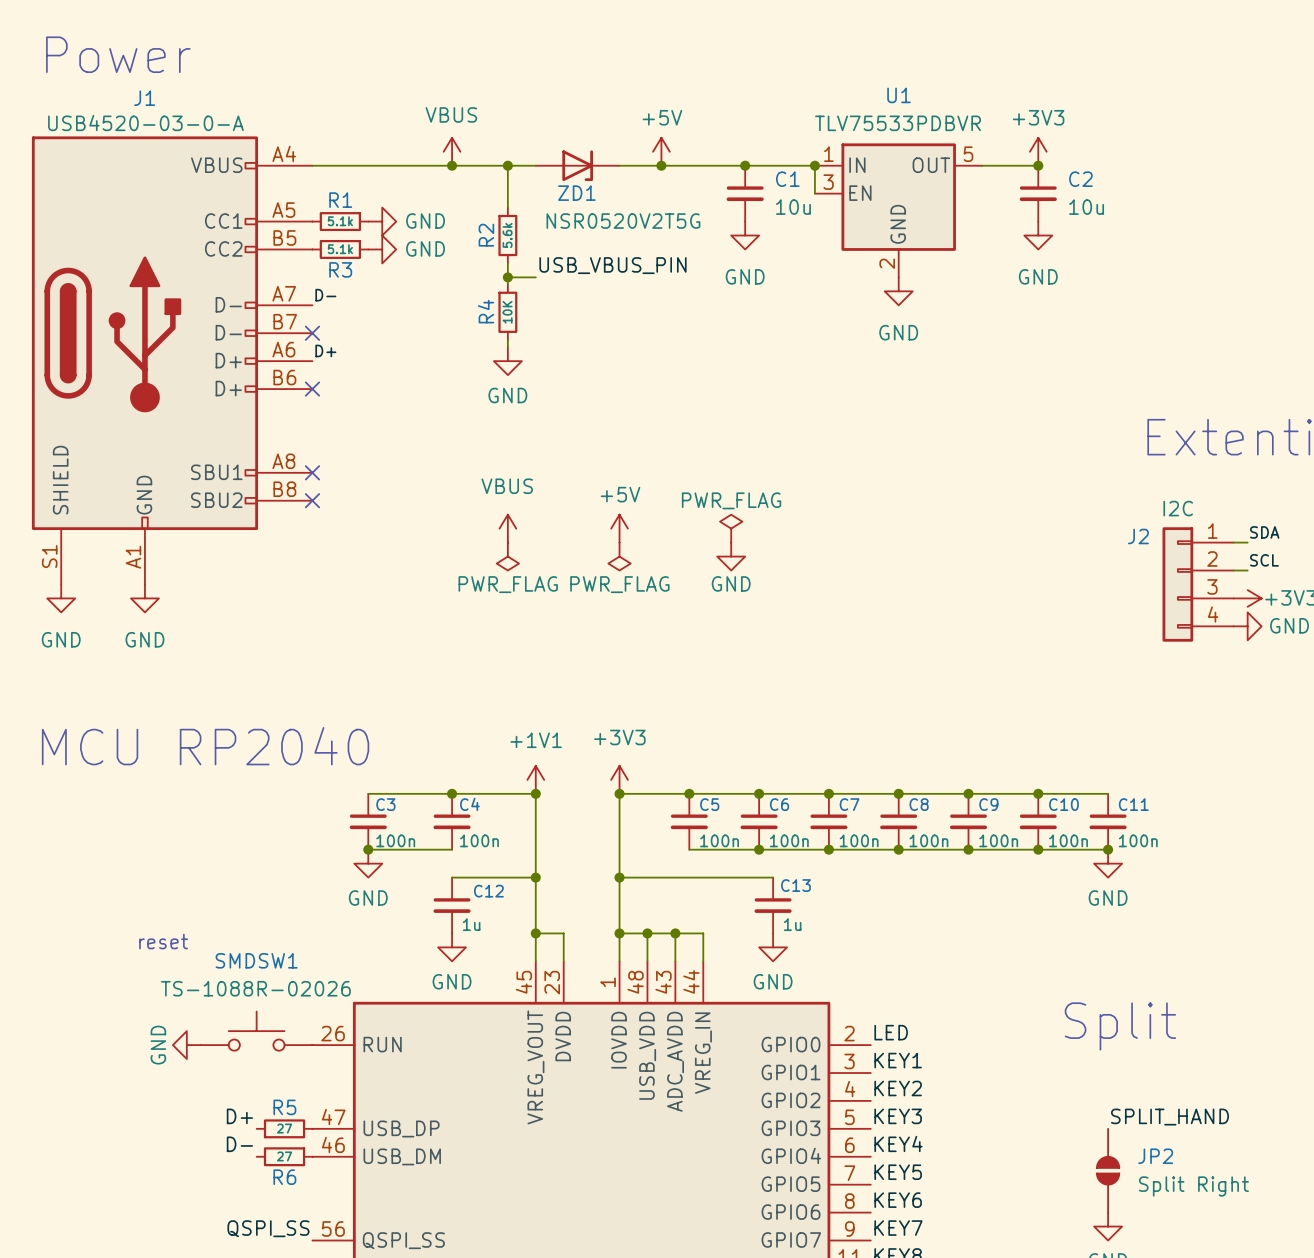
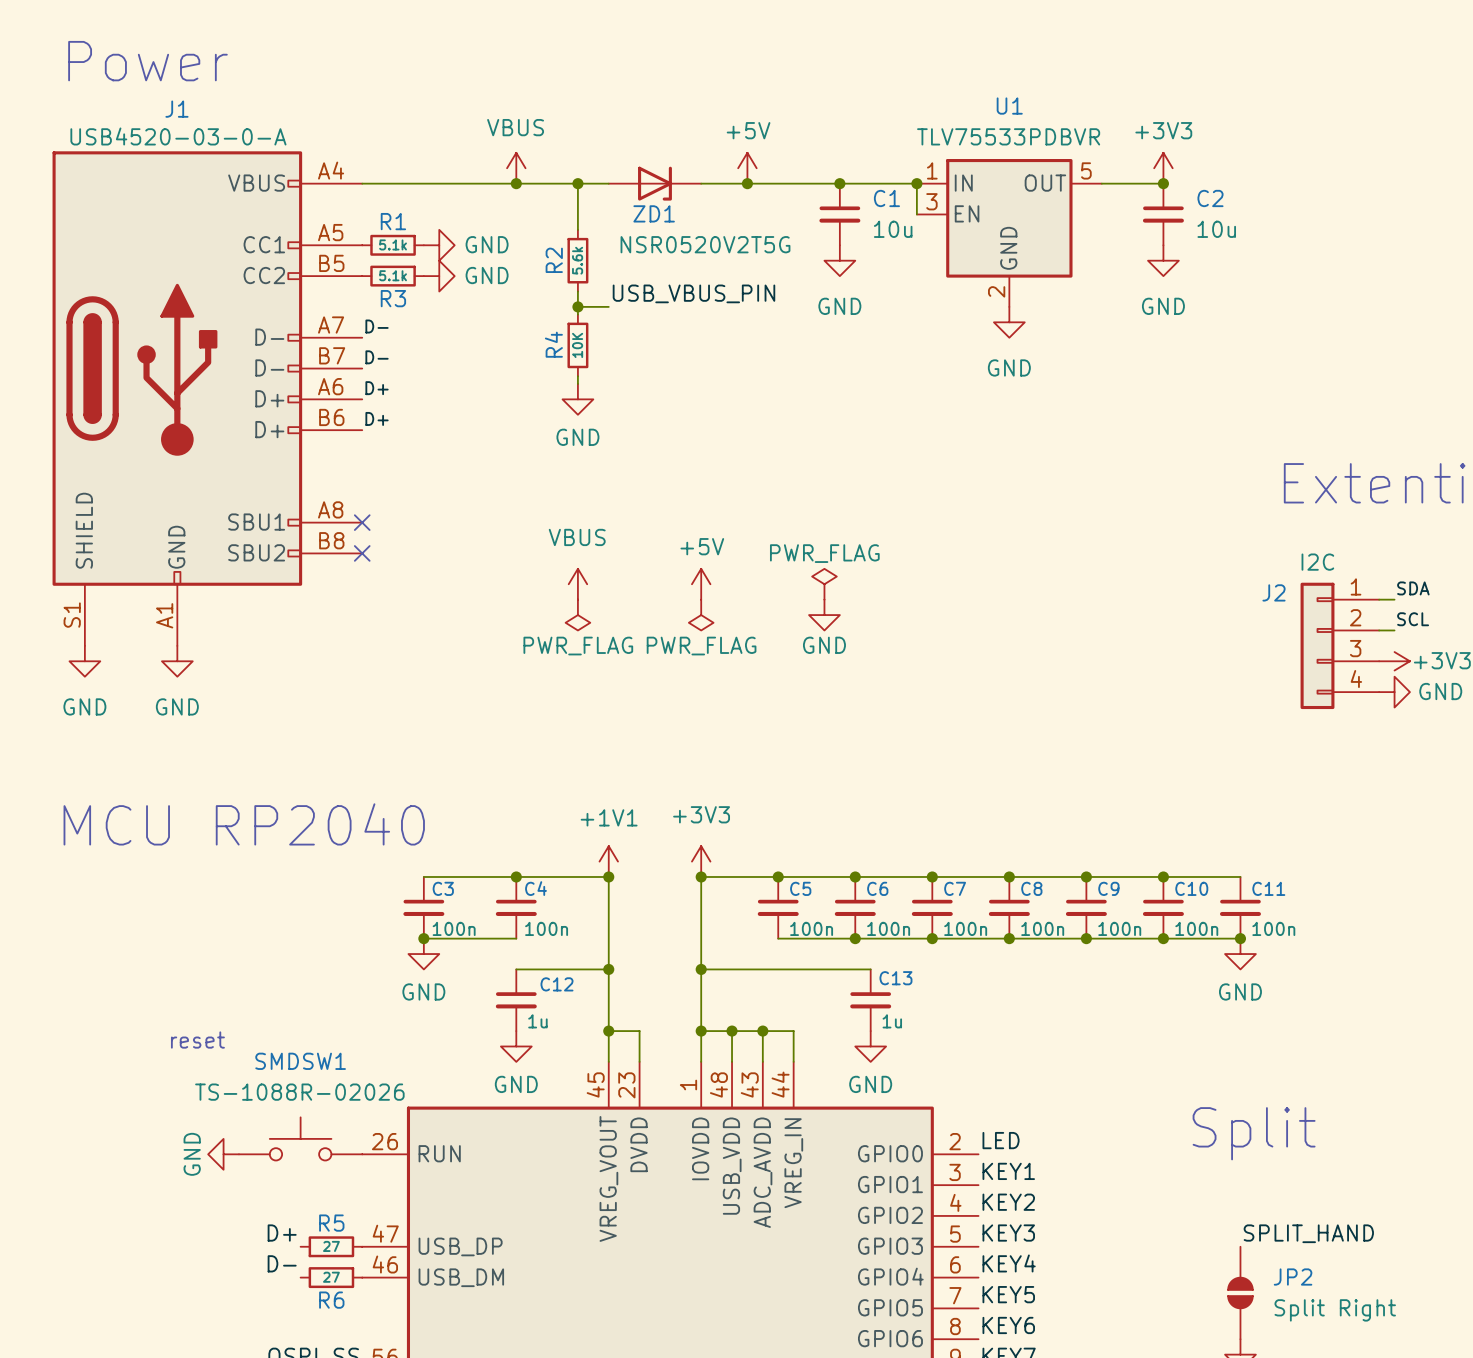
label: none -> D- (377, 357)
no-connect mark: (312, 333) -> none
label: none -> D+ (377, 418)
no-connect mark: (312, 389) -> none

